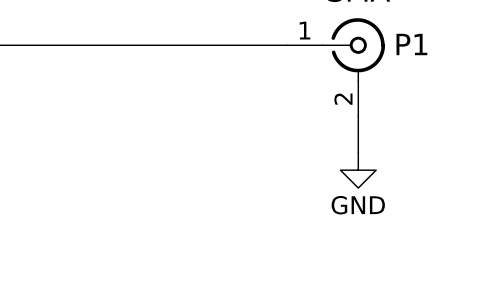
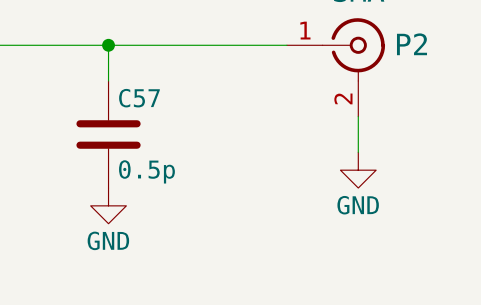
P1 name: P1 (411, 44) -> P2 (412, 44)
wire: none -> (108, 45) (108, 80)
junction: none -> (108, 45)
C57: none -> 0.5p (108, 134)
power symbol: none -> GND (108, 205)

